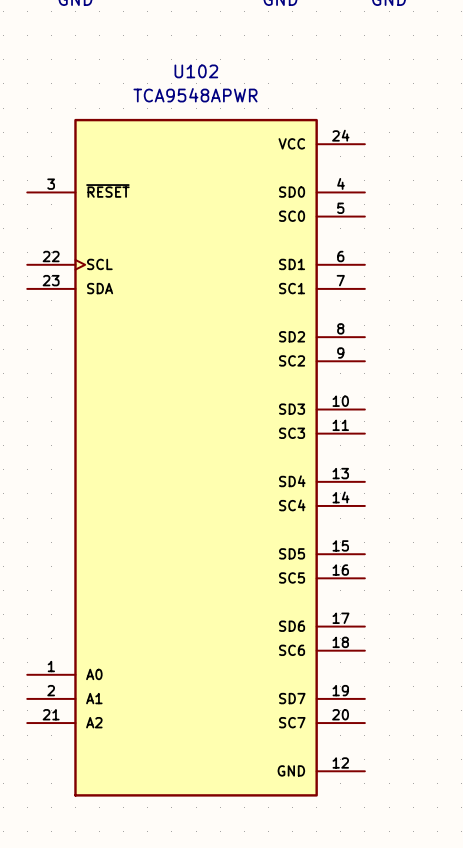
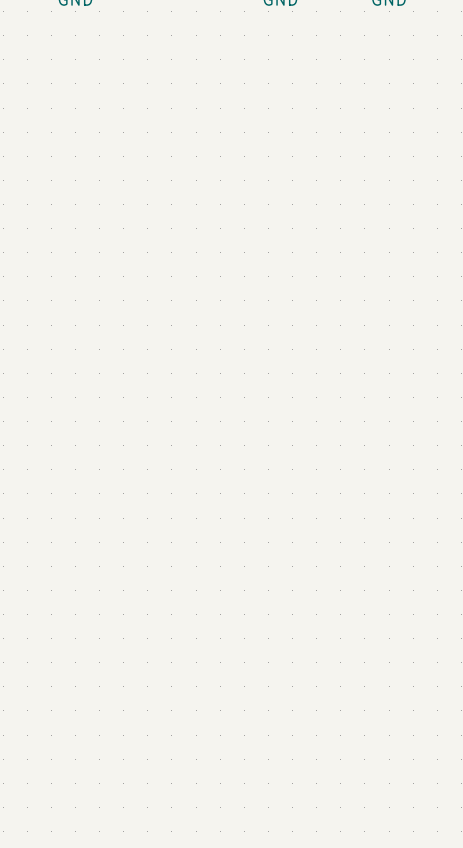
U102: TCA9548APWR (196, 457) -> none

